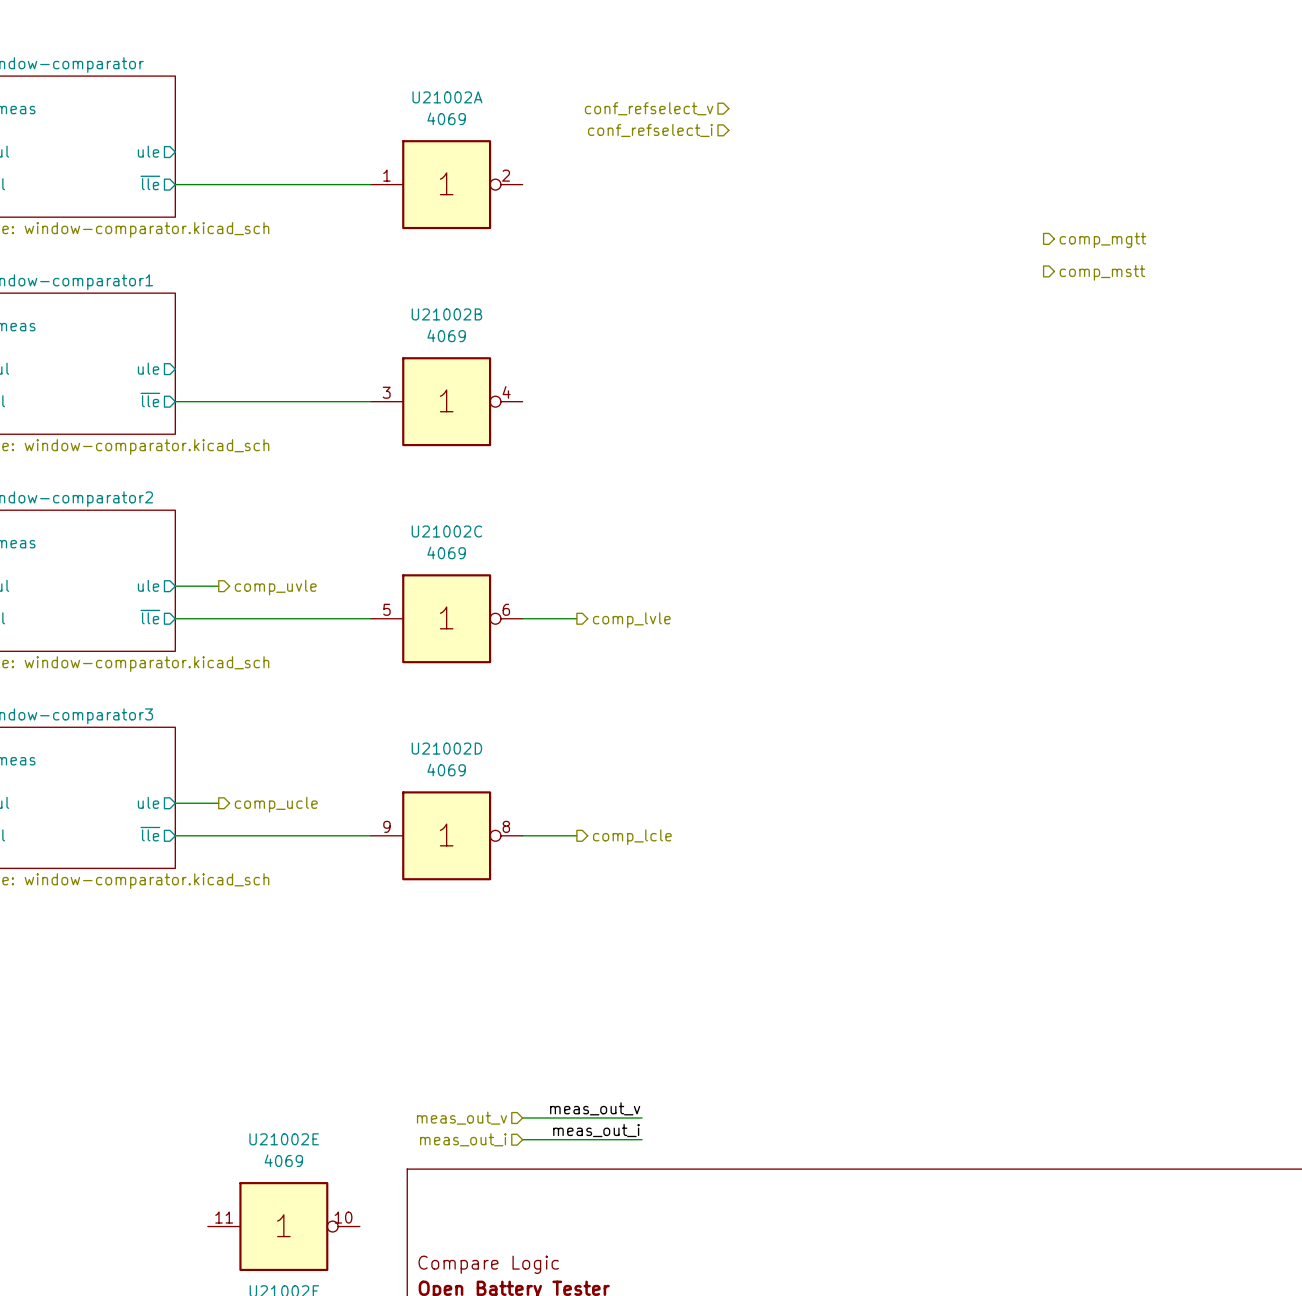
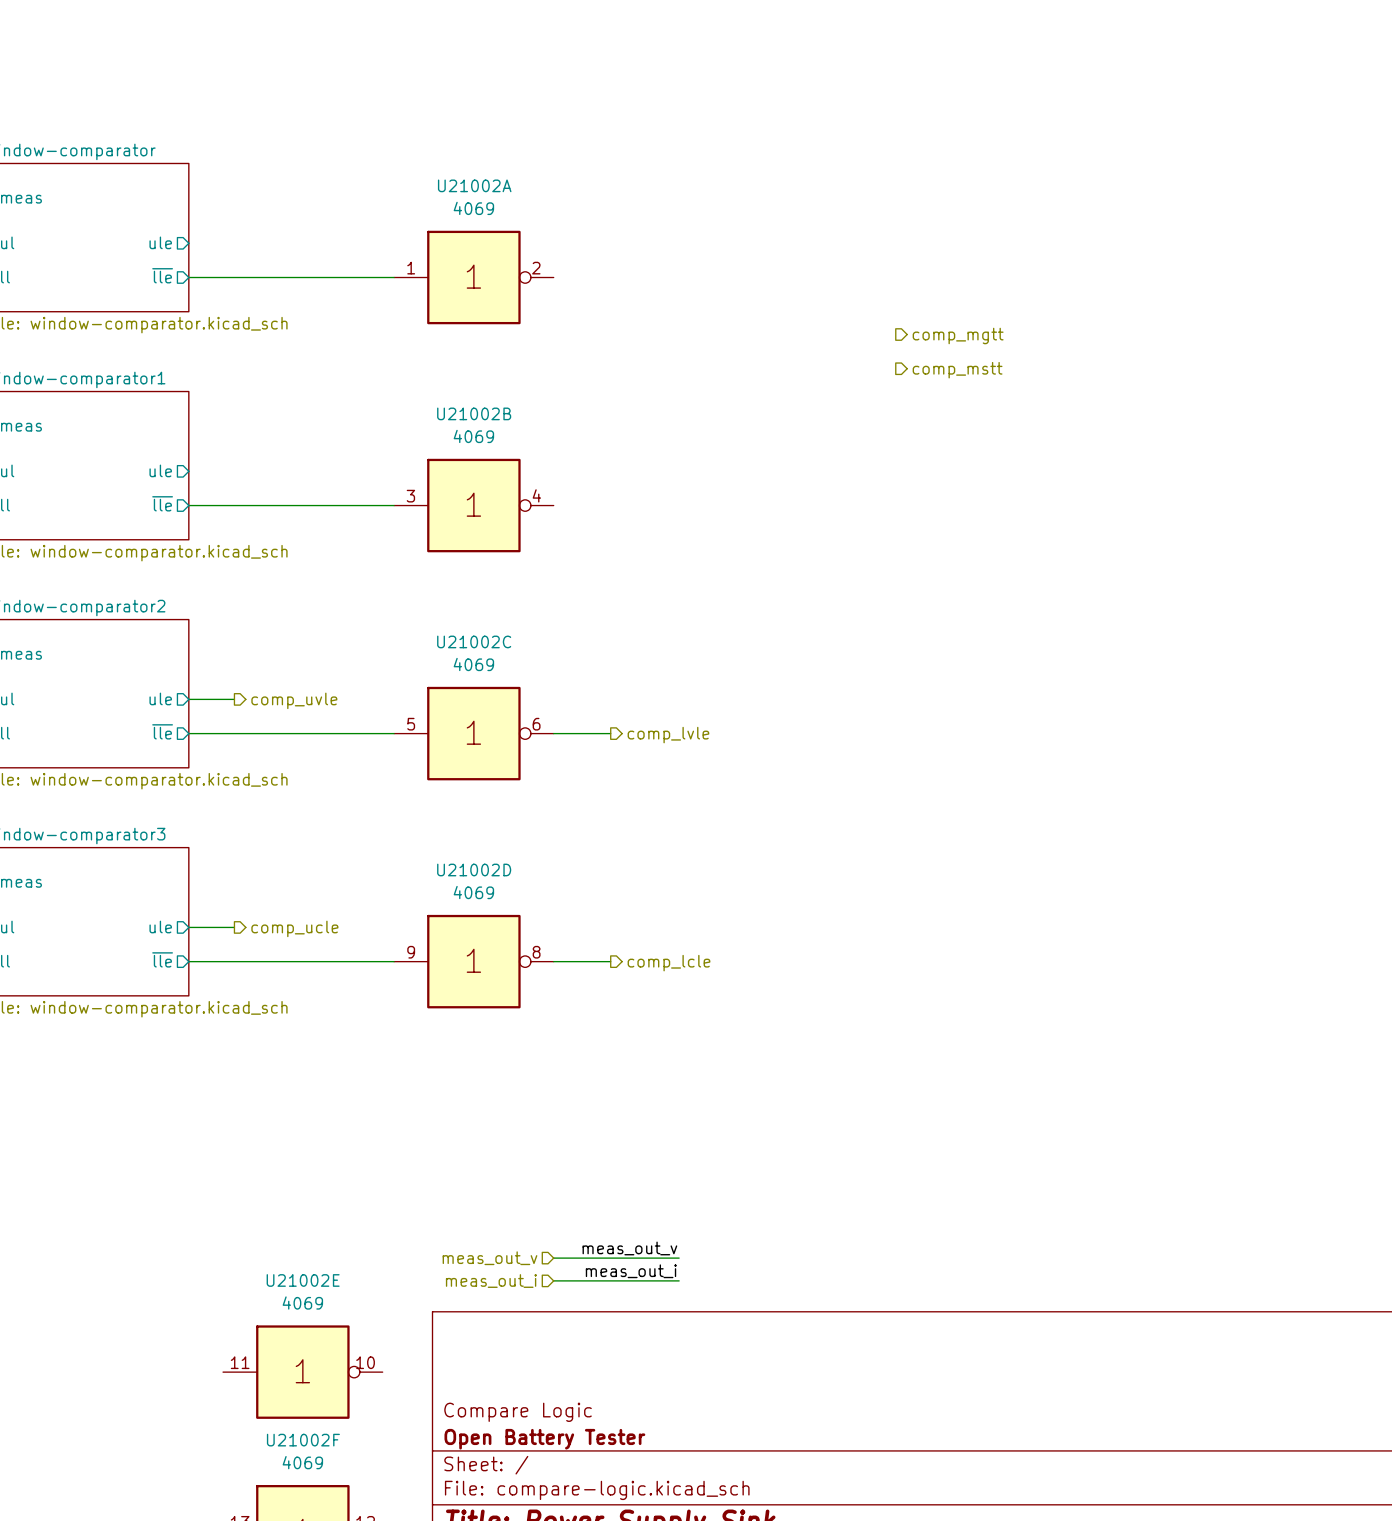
hierarchical label: conf_refselect_v (649, 108) -> none
hierarchical label: conf_refselect_i (650, 130) -> none
hierarchical label position: comp_mgtt (1102, 240) -> comp_mgtt (958, 335)
hierarchical label position: comp_mstt (1102, 272) -> comp_mstt (957, 370)

